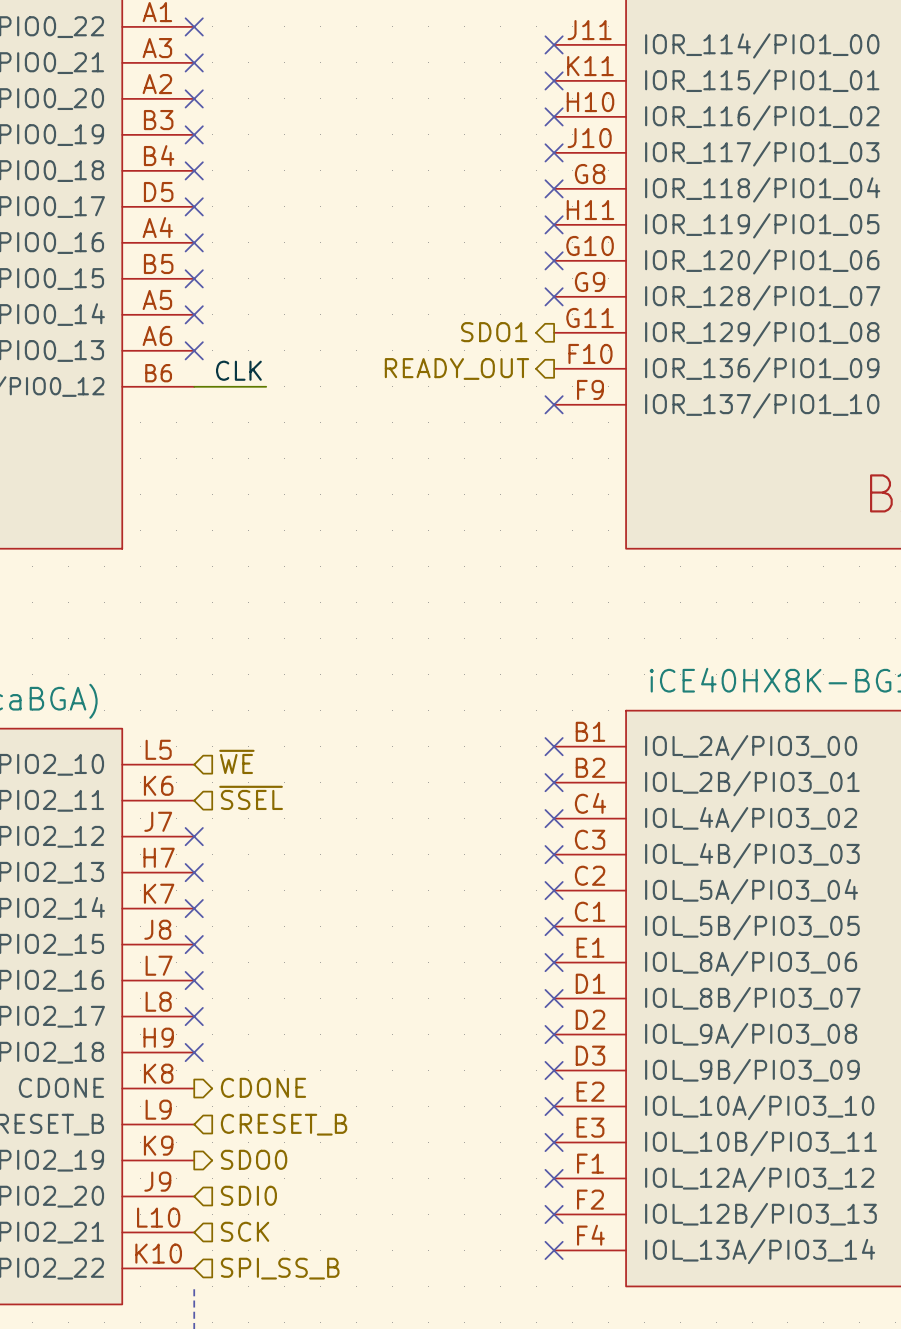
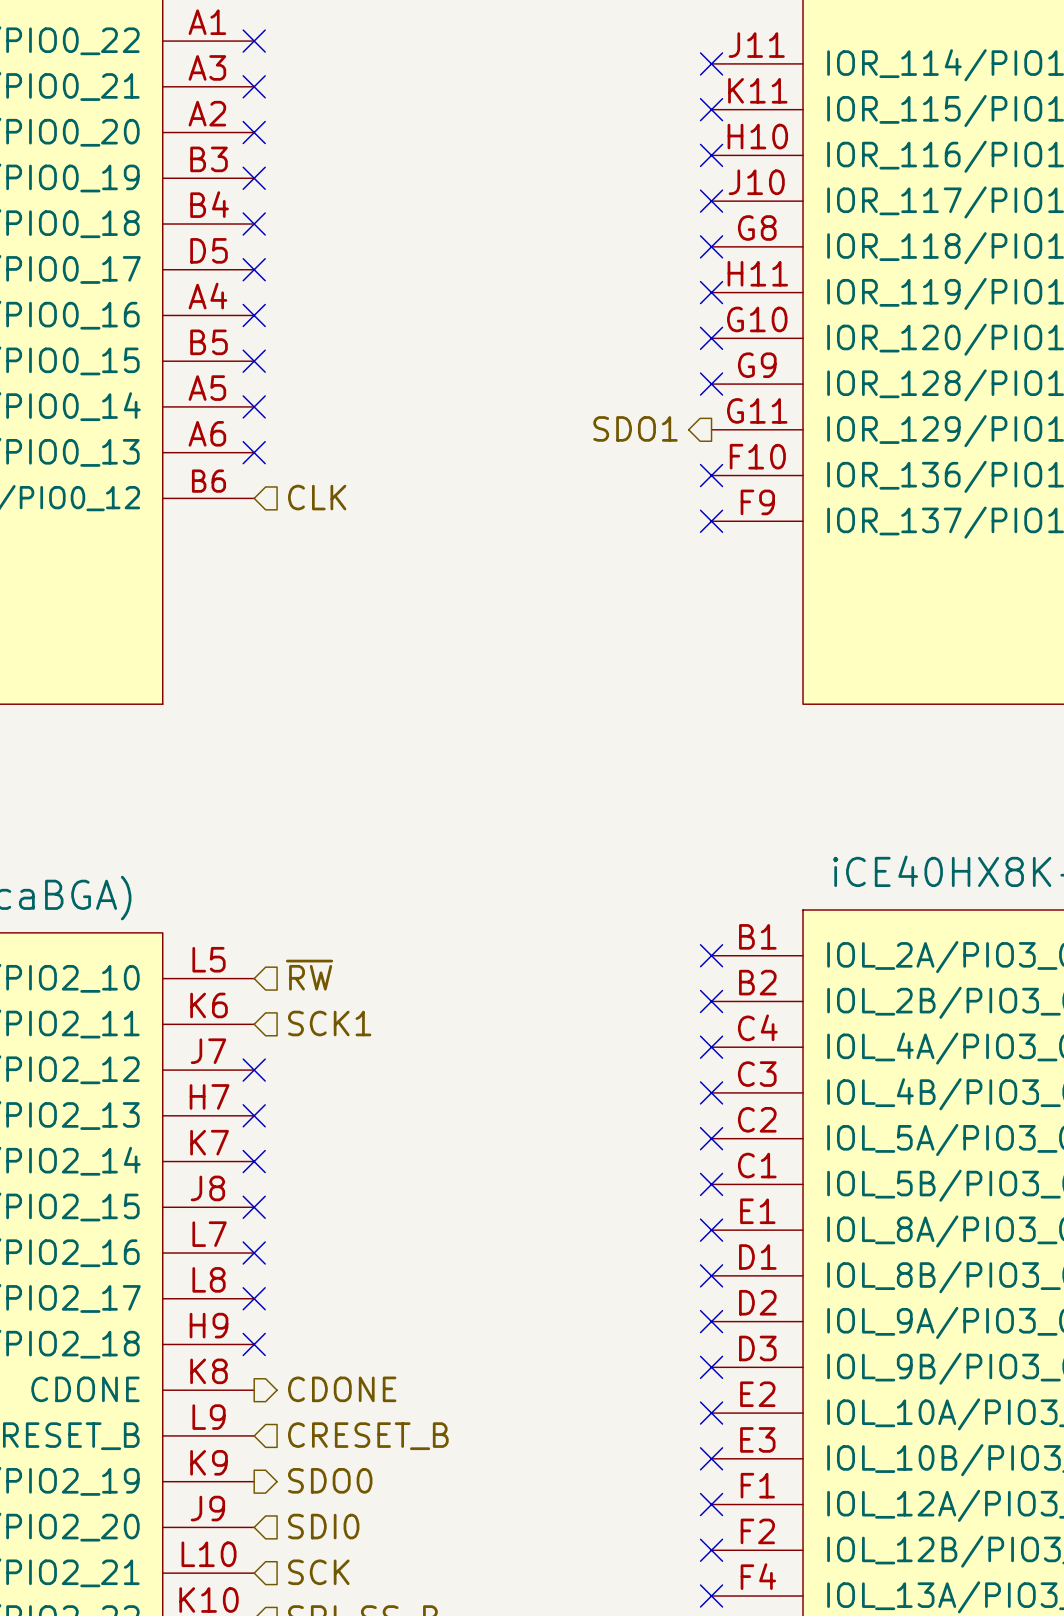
hierarchical label: READY_OUT (456, 368) -> none
no-connect mark: none -> (711, 475)
label: CLK (238, 370) -> none
wire: (194, 386) (266, 386) -> none
hierarchical label: none -> CLK (317, 497)
hierarchical label: ~{WE} (236, 761) -> ~{RW} (309, 975)
hierarchical label: ~{SSEL} (251, 797) -> SCK1 (329, 1023)

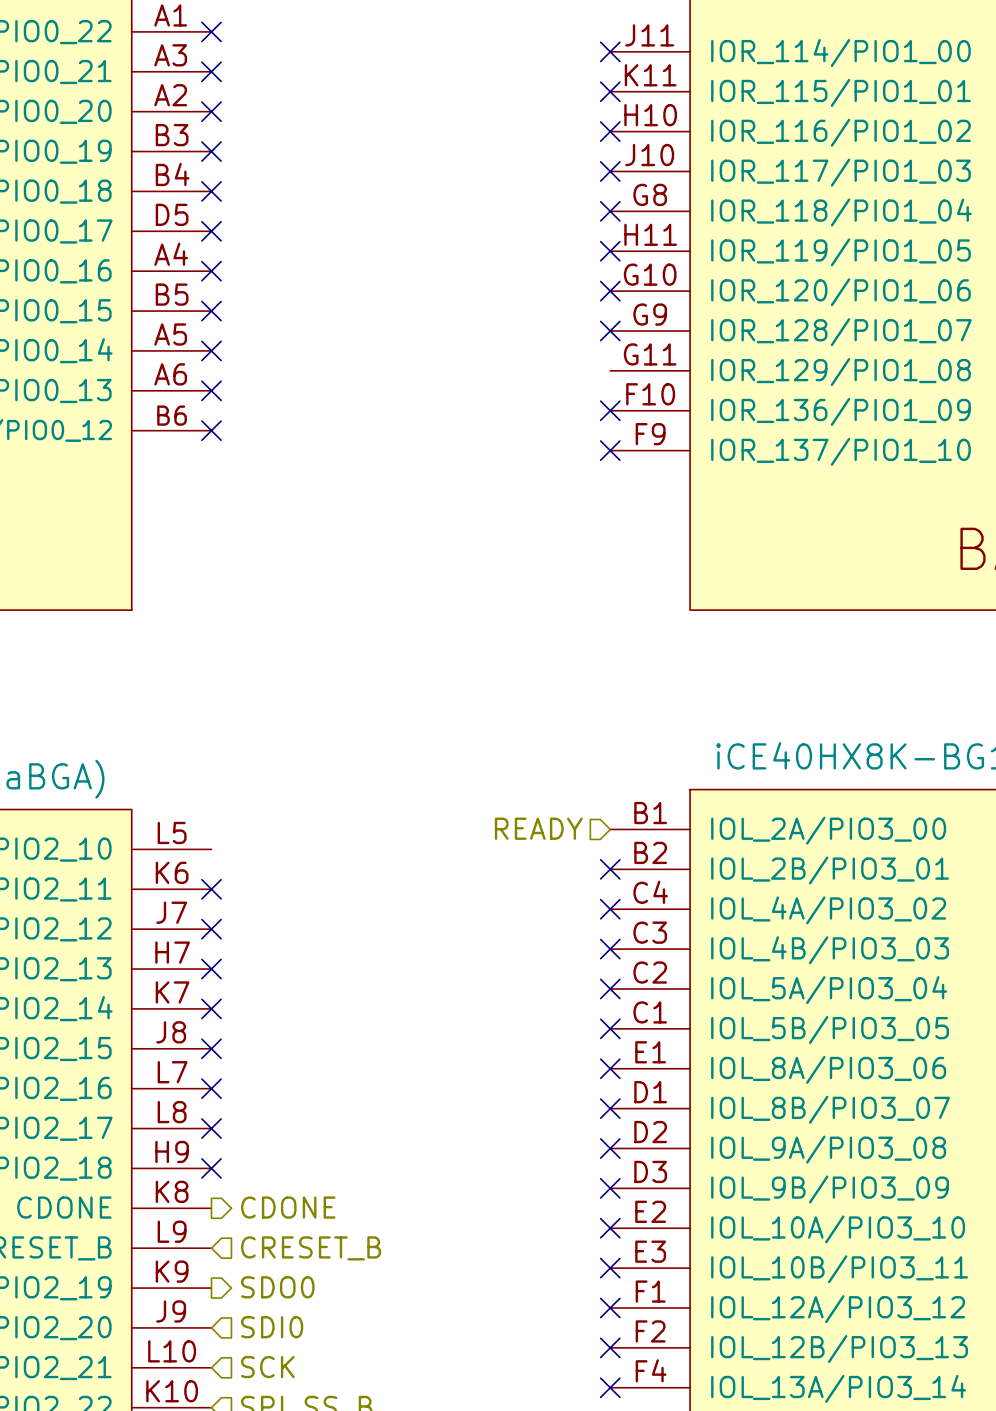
hierarchical label: SDO1 (635, 428) -> none
hierarchical label: CLK (317, 497) -> none
no-connect mark: none -> (211, 430)
hierarchical label: none -> READY (538, 828)
no-connect mark: (711, 955) -> none
hierarchical label: ~{RW} (309, 975) -> none
hierarchical label: SCK1 (329, 1023) -> none
no-connect mark: none -> (211, 889)

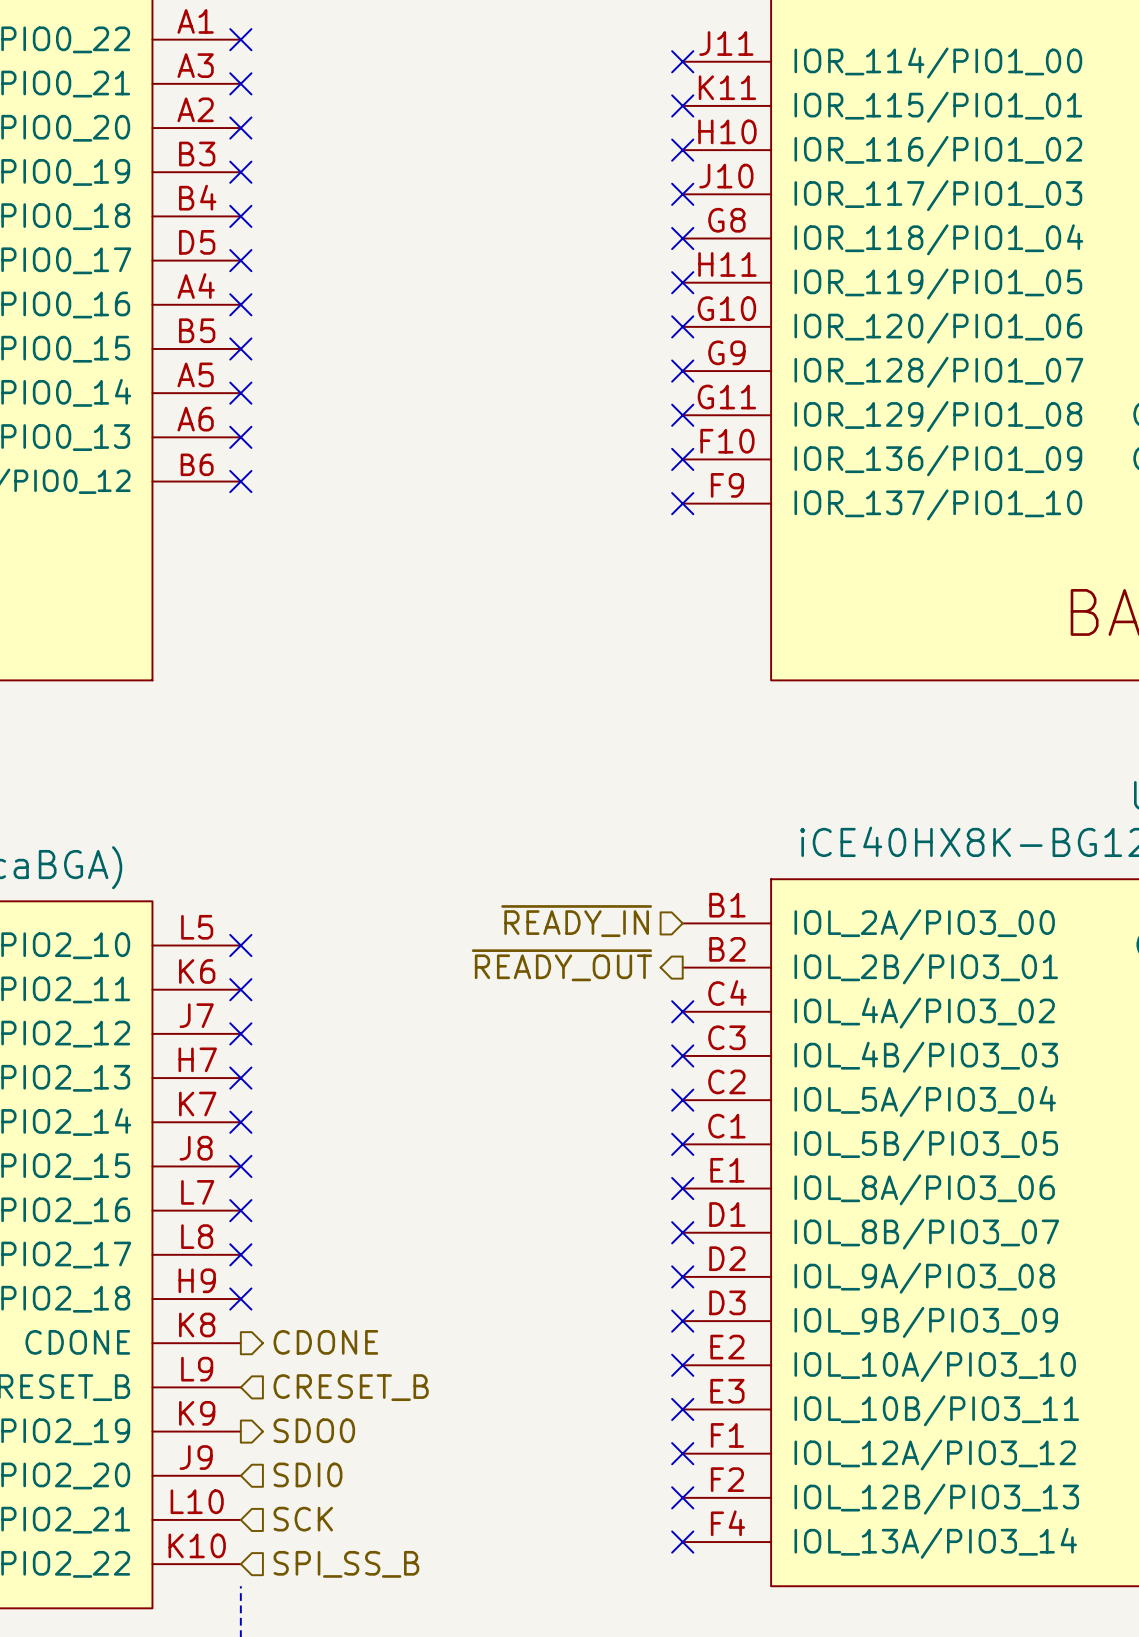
no-connect mark: none -> (682, 415)
hierarchical label: READY (538, 828) -> ~{READY_IN} (576, 921)
no-connect mark: none -> (240, 945)
hierarchical label: none -> ~{READY_OUT} (561, 965)
no-connect mark: (610, 869) -> none

